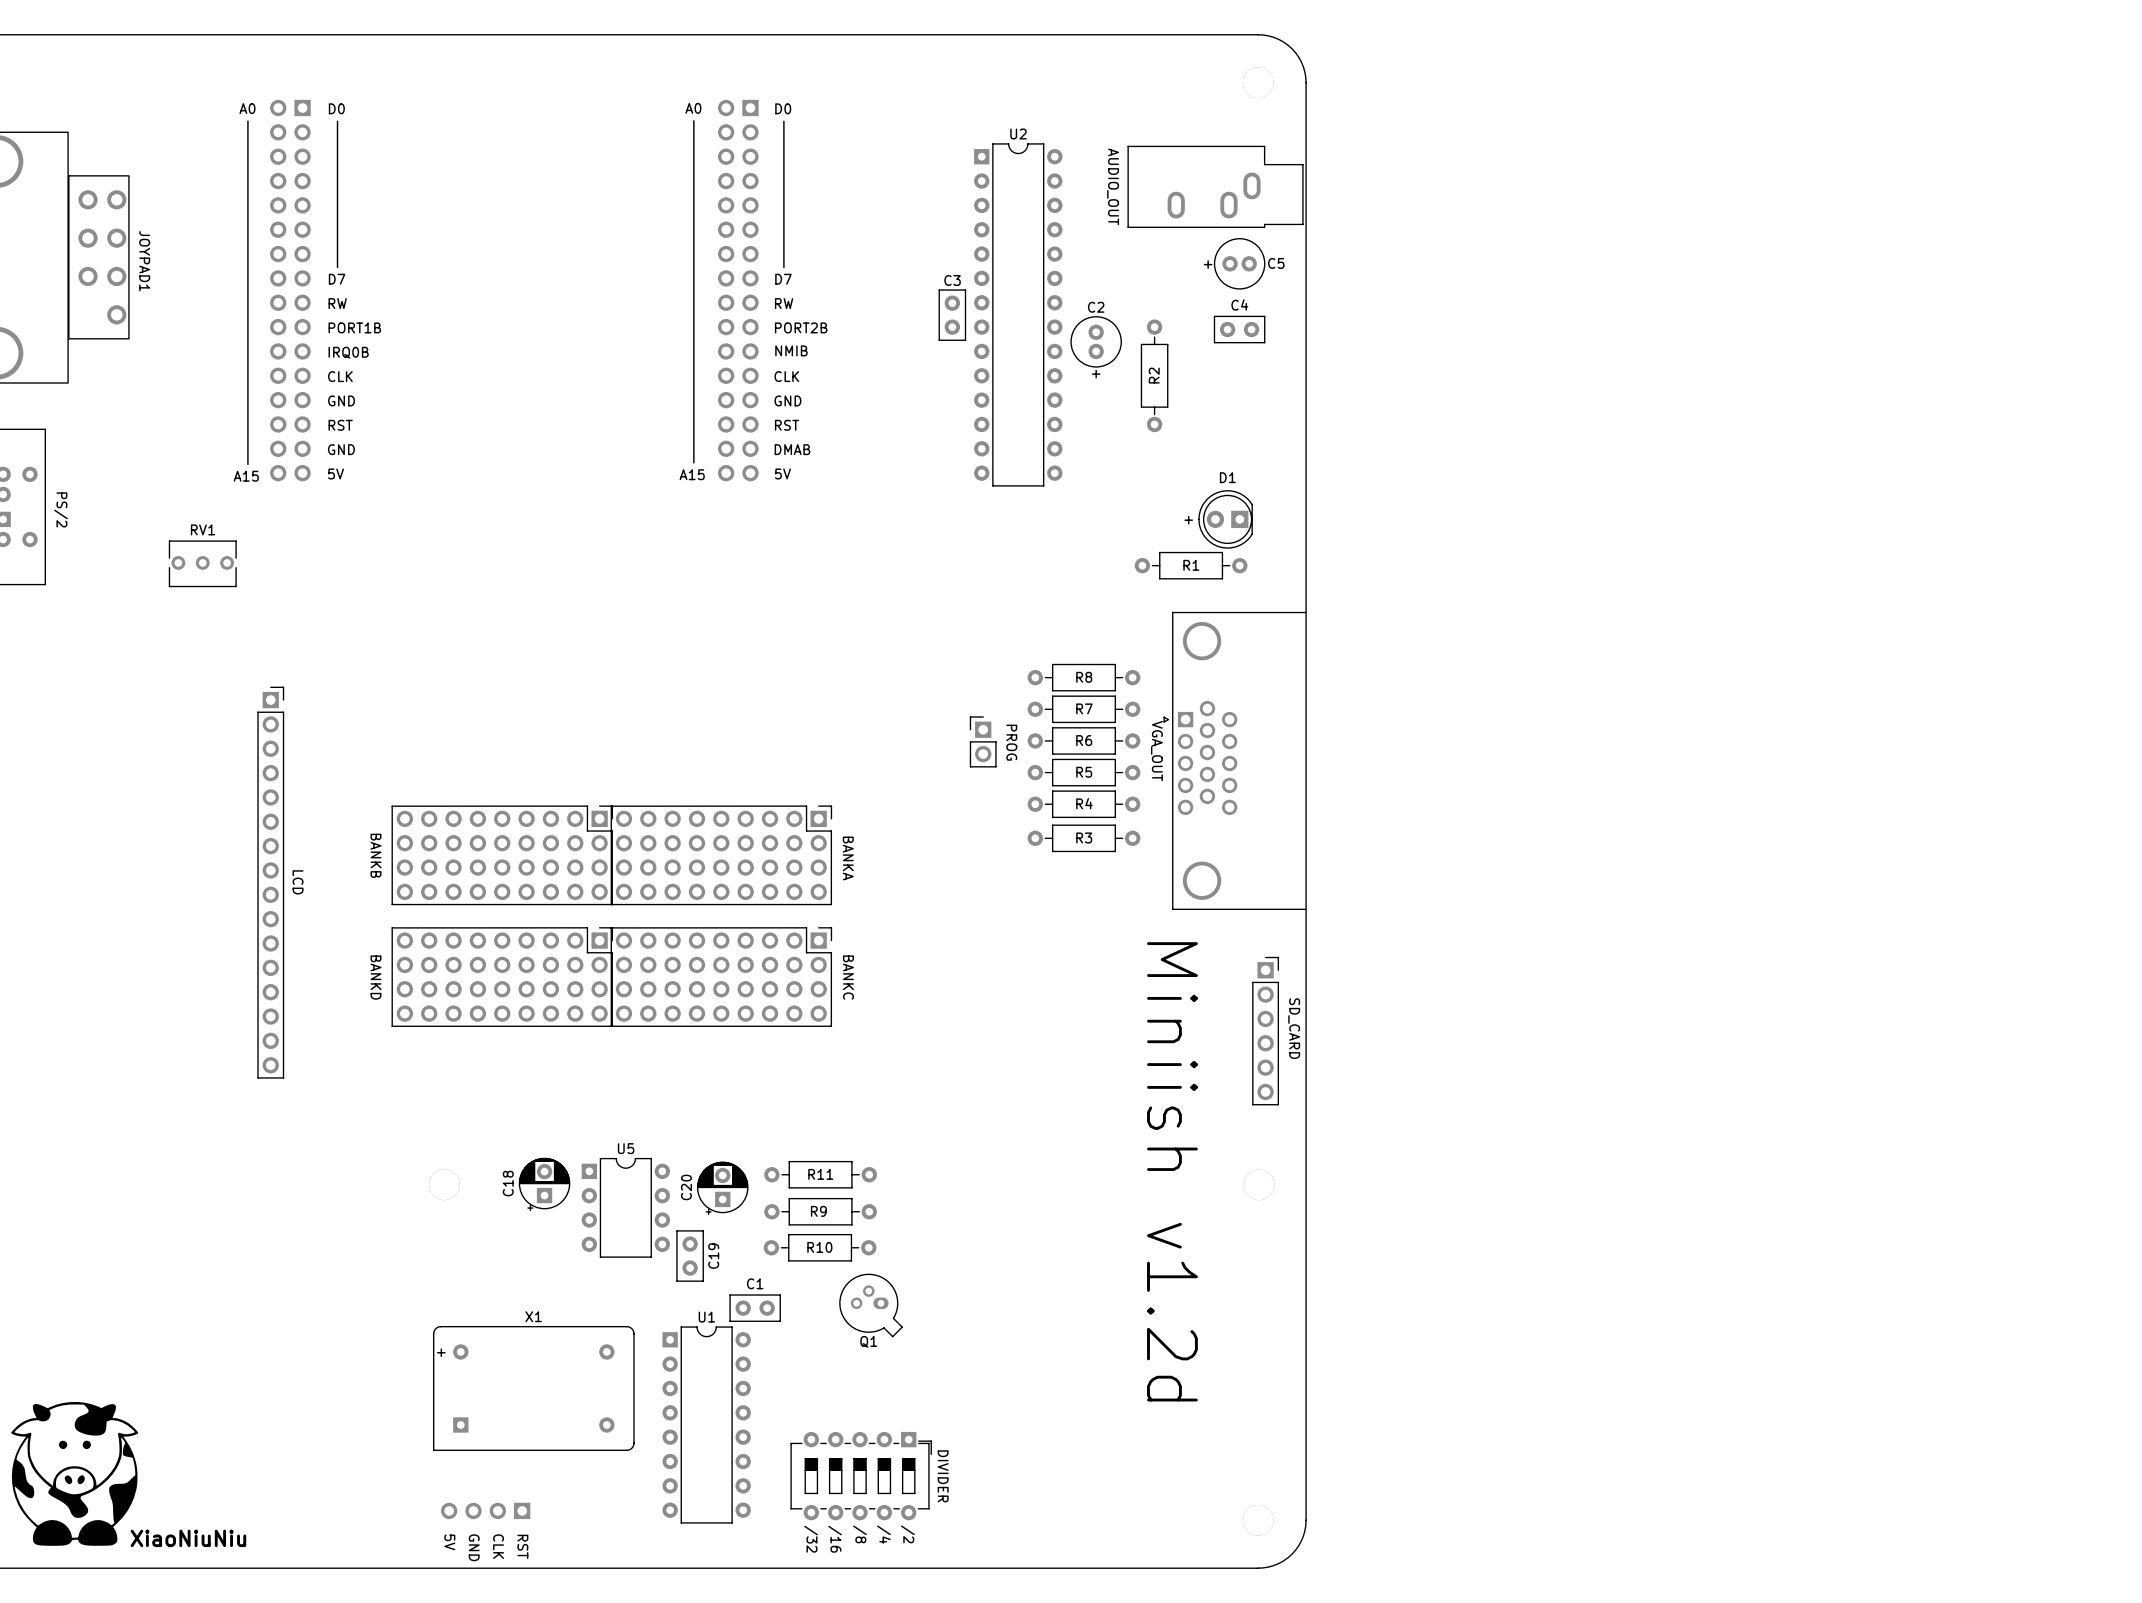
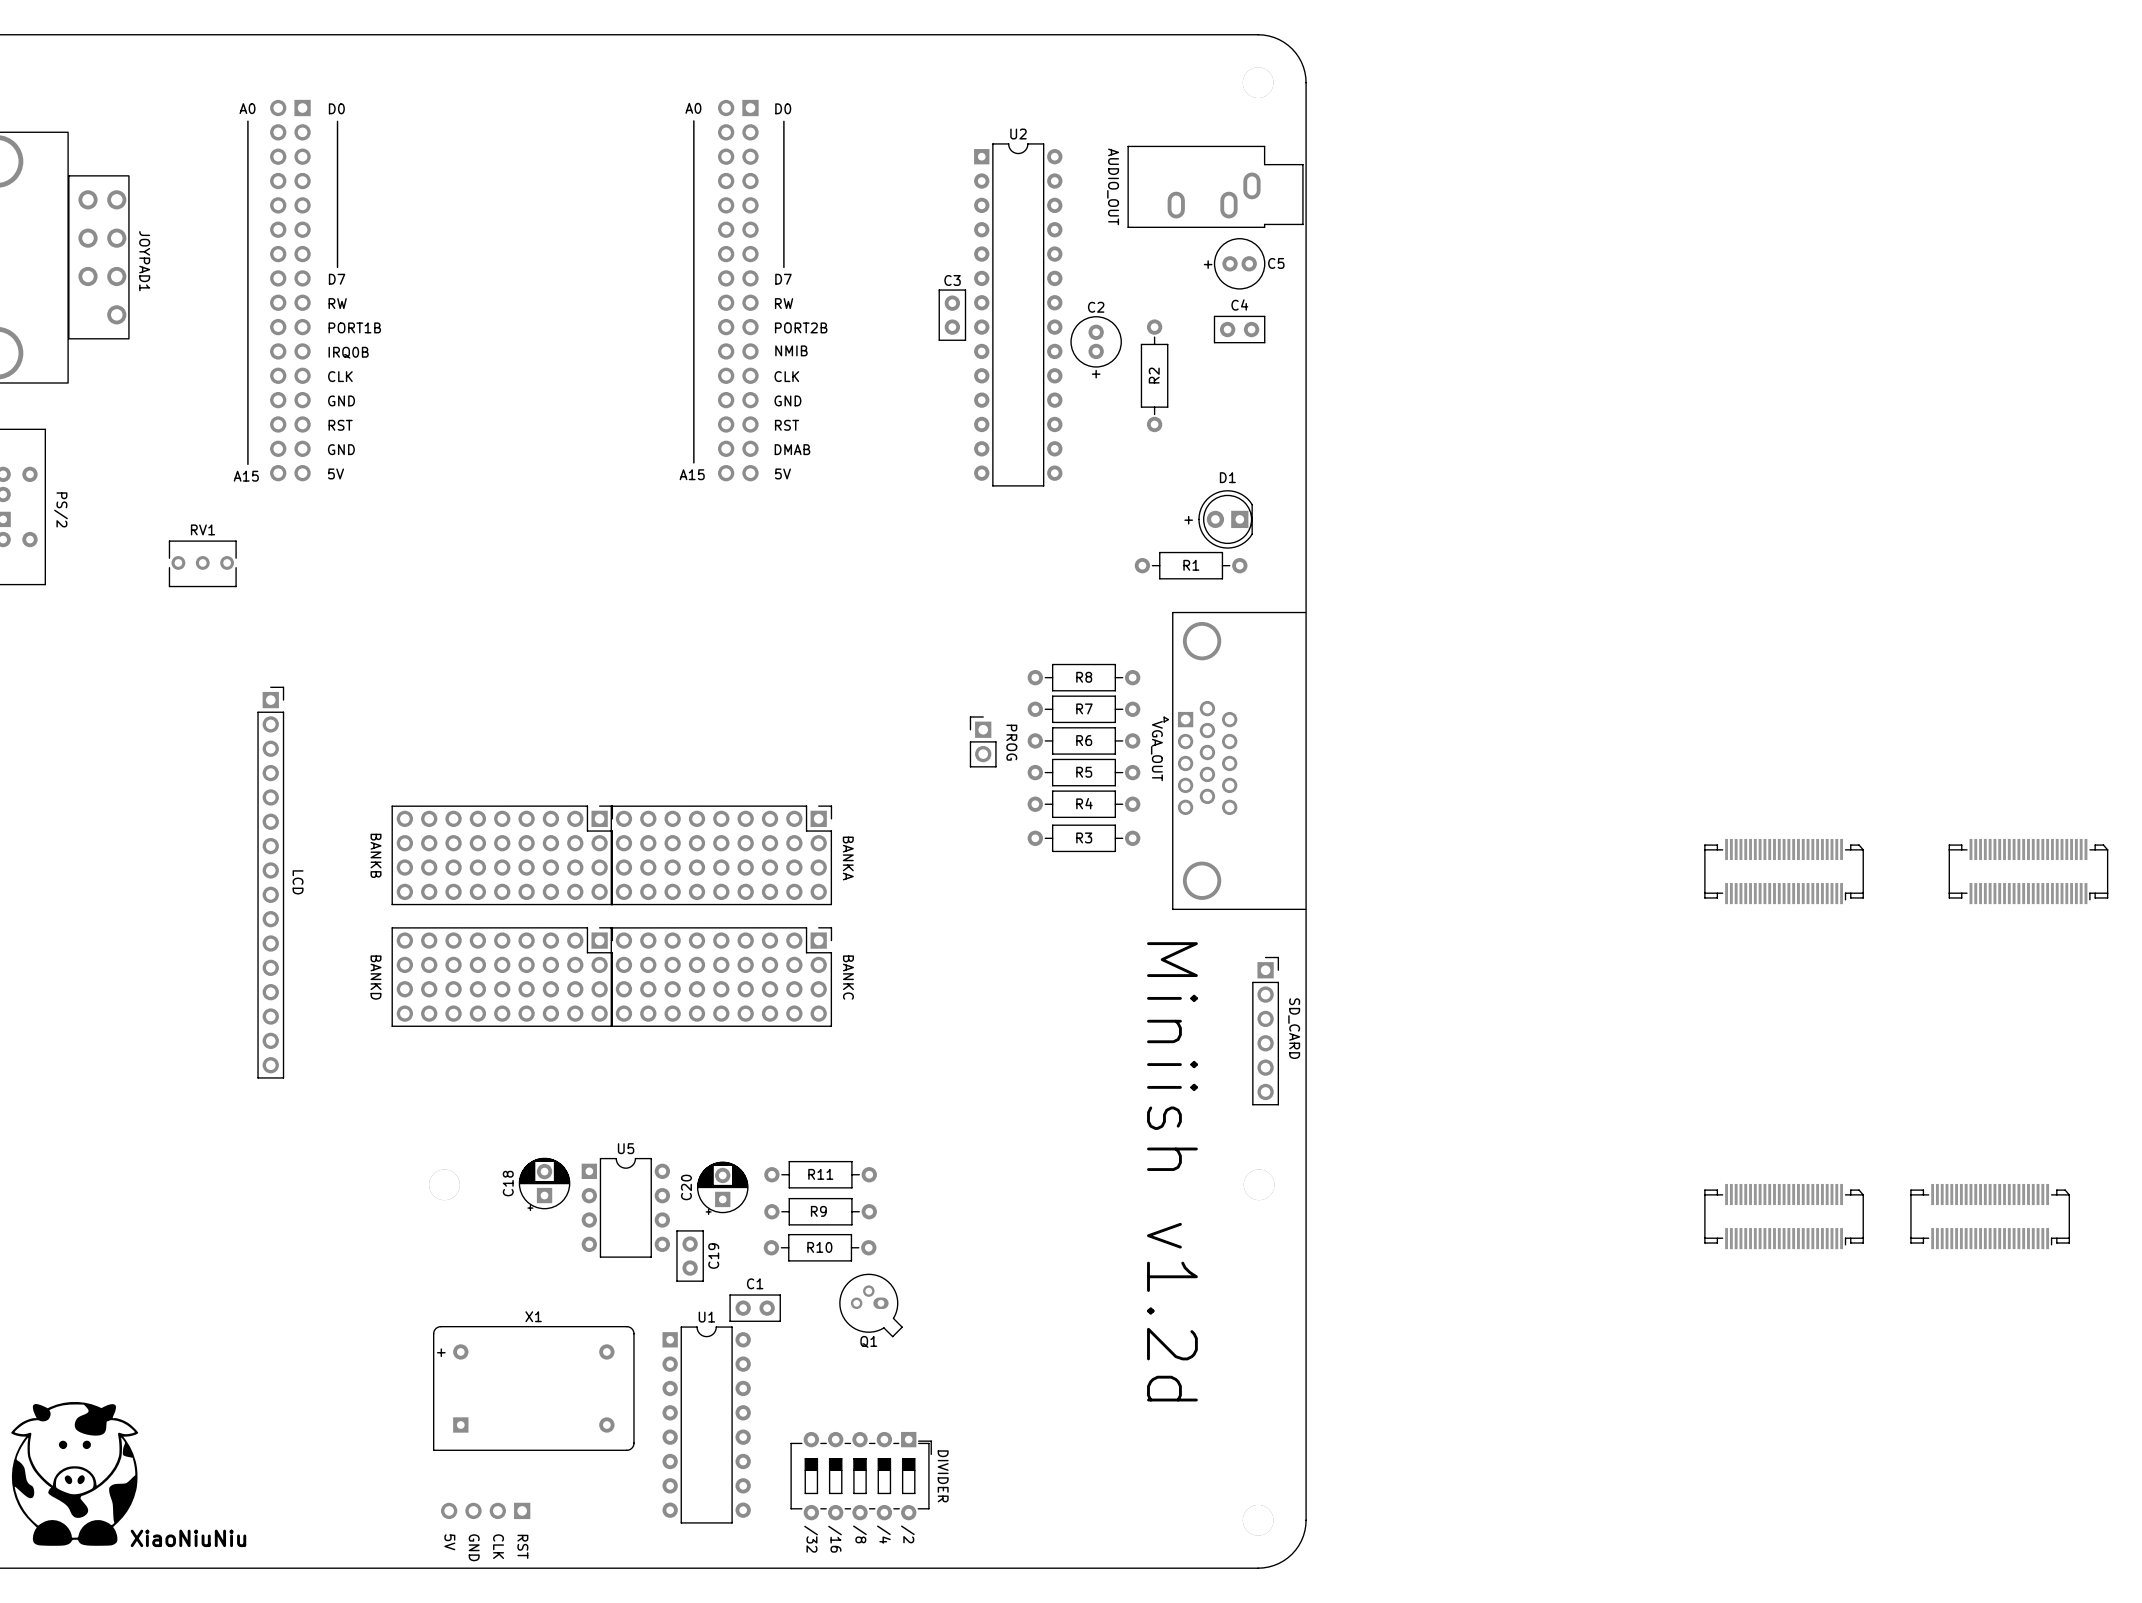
part: none -> (1784, 871)
part: none -> (2028, 871)
part: none -> (1784, 1216)
part: none -> (1990, 1216)

